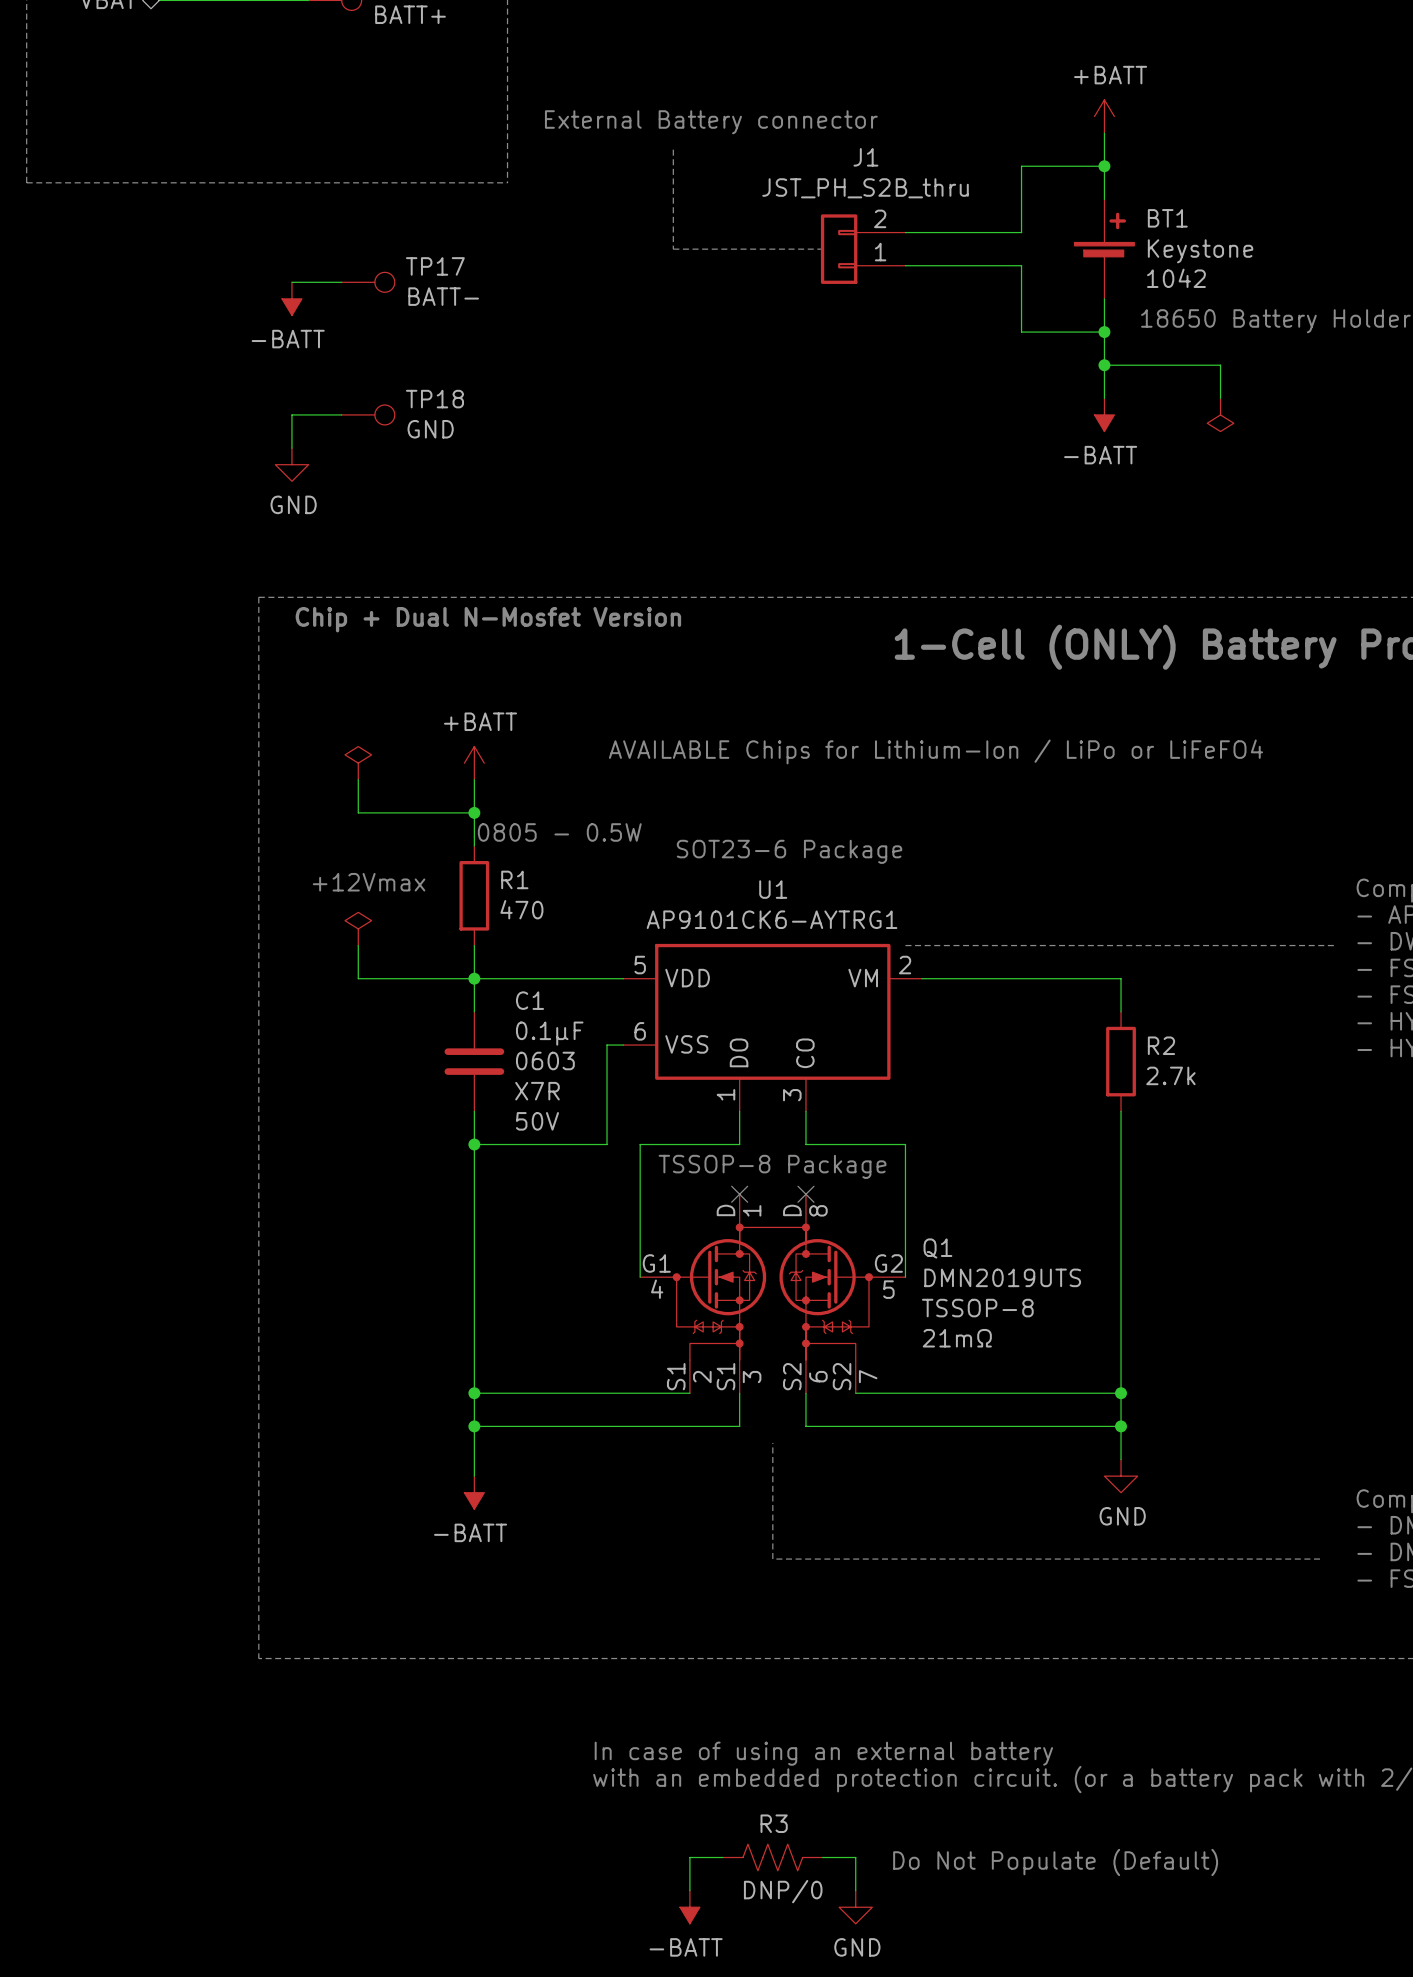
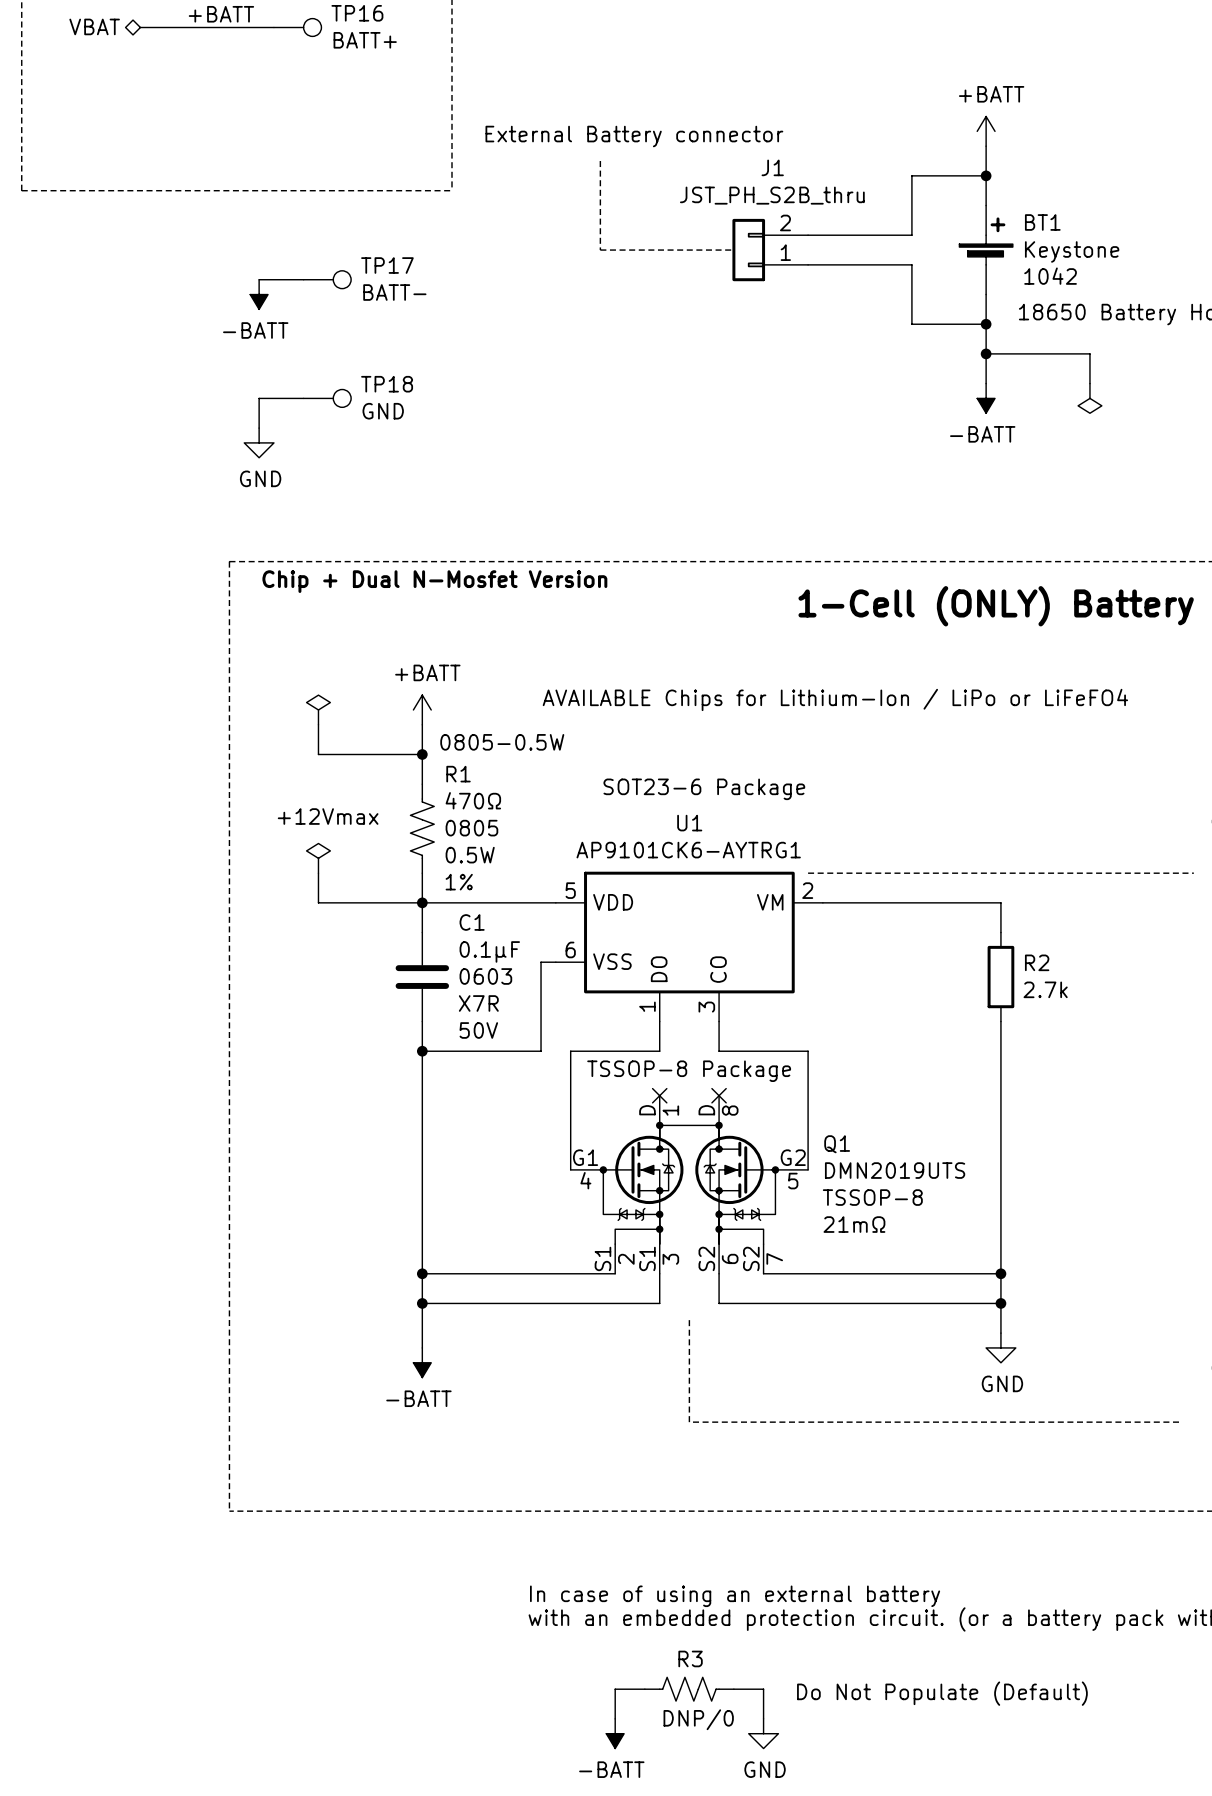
text: 0805 - 0.5W (559, 832) -> 0805-0.5W (502, 742)
R1 symbol: [459, 846, 490, 946] -> [410, 784, 435, 874]
R1 text: none -> 470Ω (473, 800)
R1 name position: R1 (514, 879) -> R1 (458, 774)
R1 text: none -> 0805 (471, 828)
R1 value: 470 (521, 909) -> none
R1 text: none -> 0.5W (470, 855)
R1 text: none -> 1% (459, 882)

